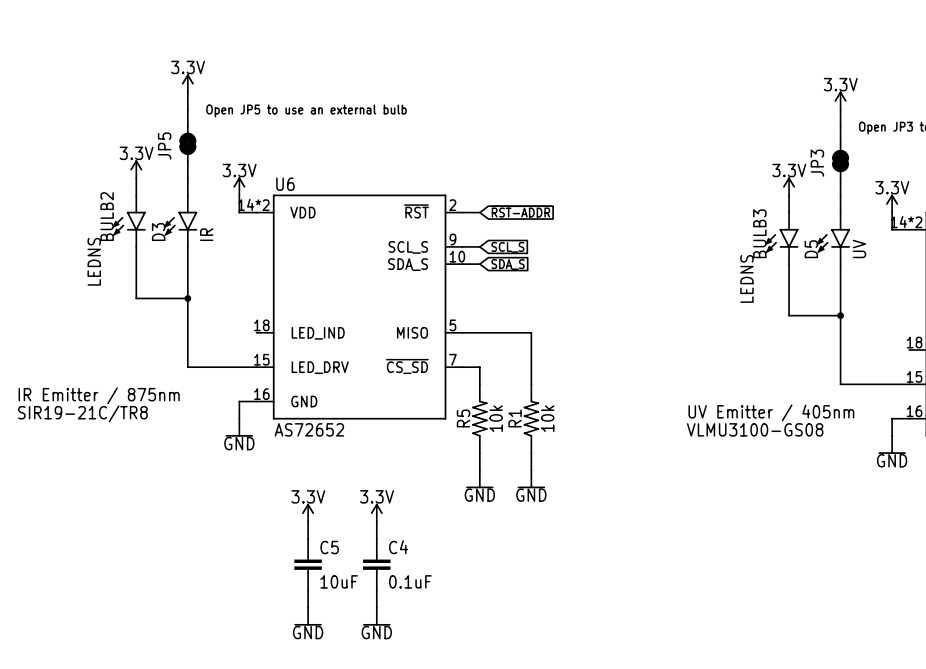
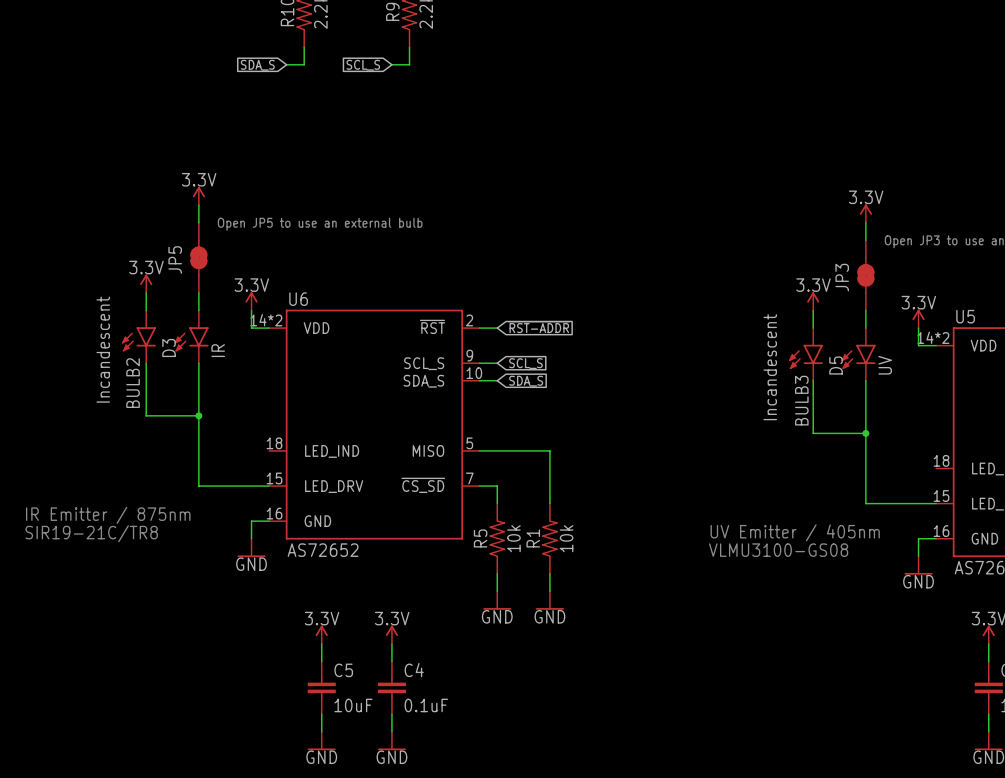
BULB2 name position: BULB2 (107, 216) -> BULB2 (133, 383)
BULB3 name position: BULB3 (759, 233) -> BULB3 (801, 400)
BULB2 value: LEDNS (94, 261) -> Incandescent (103, 349)
BULB3 value: LEDNS (746, 278) -> Incandescent (770, 367)

